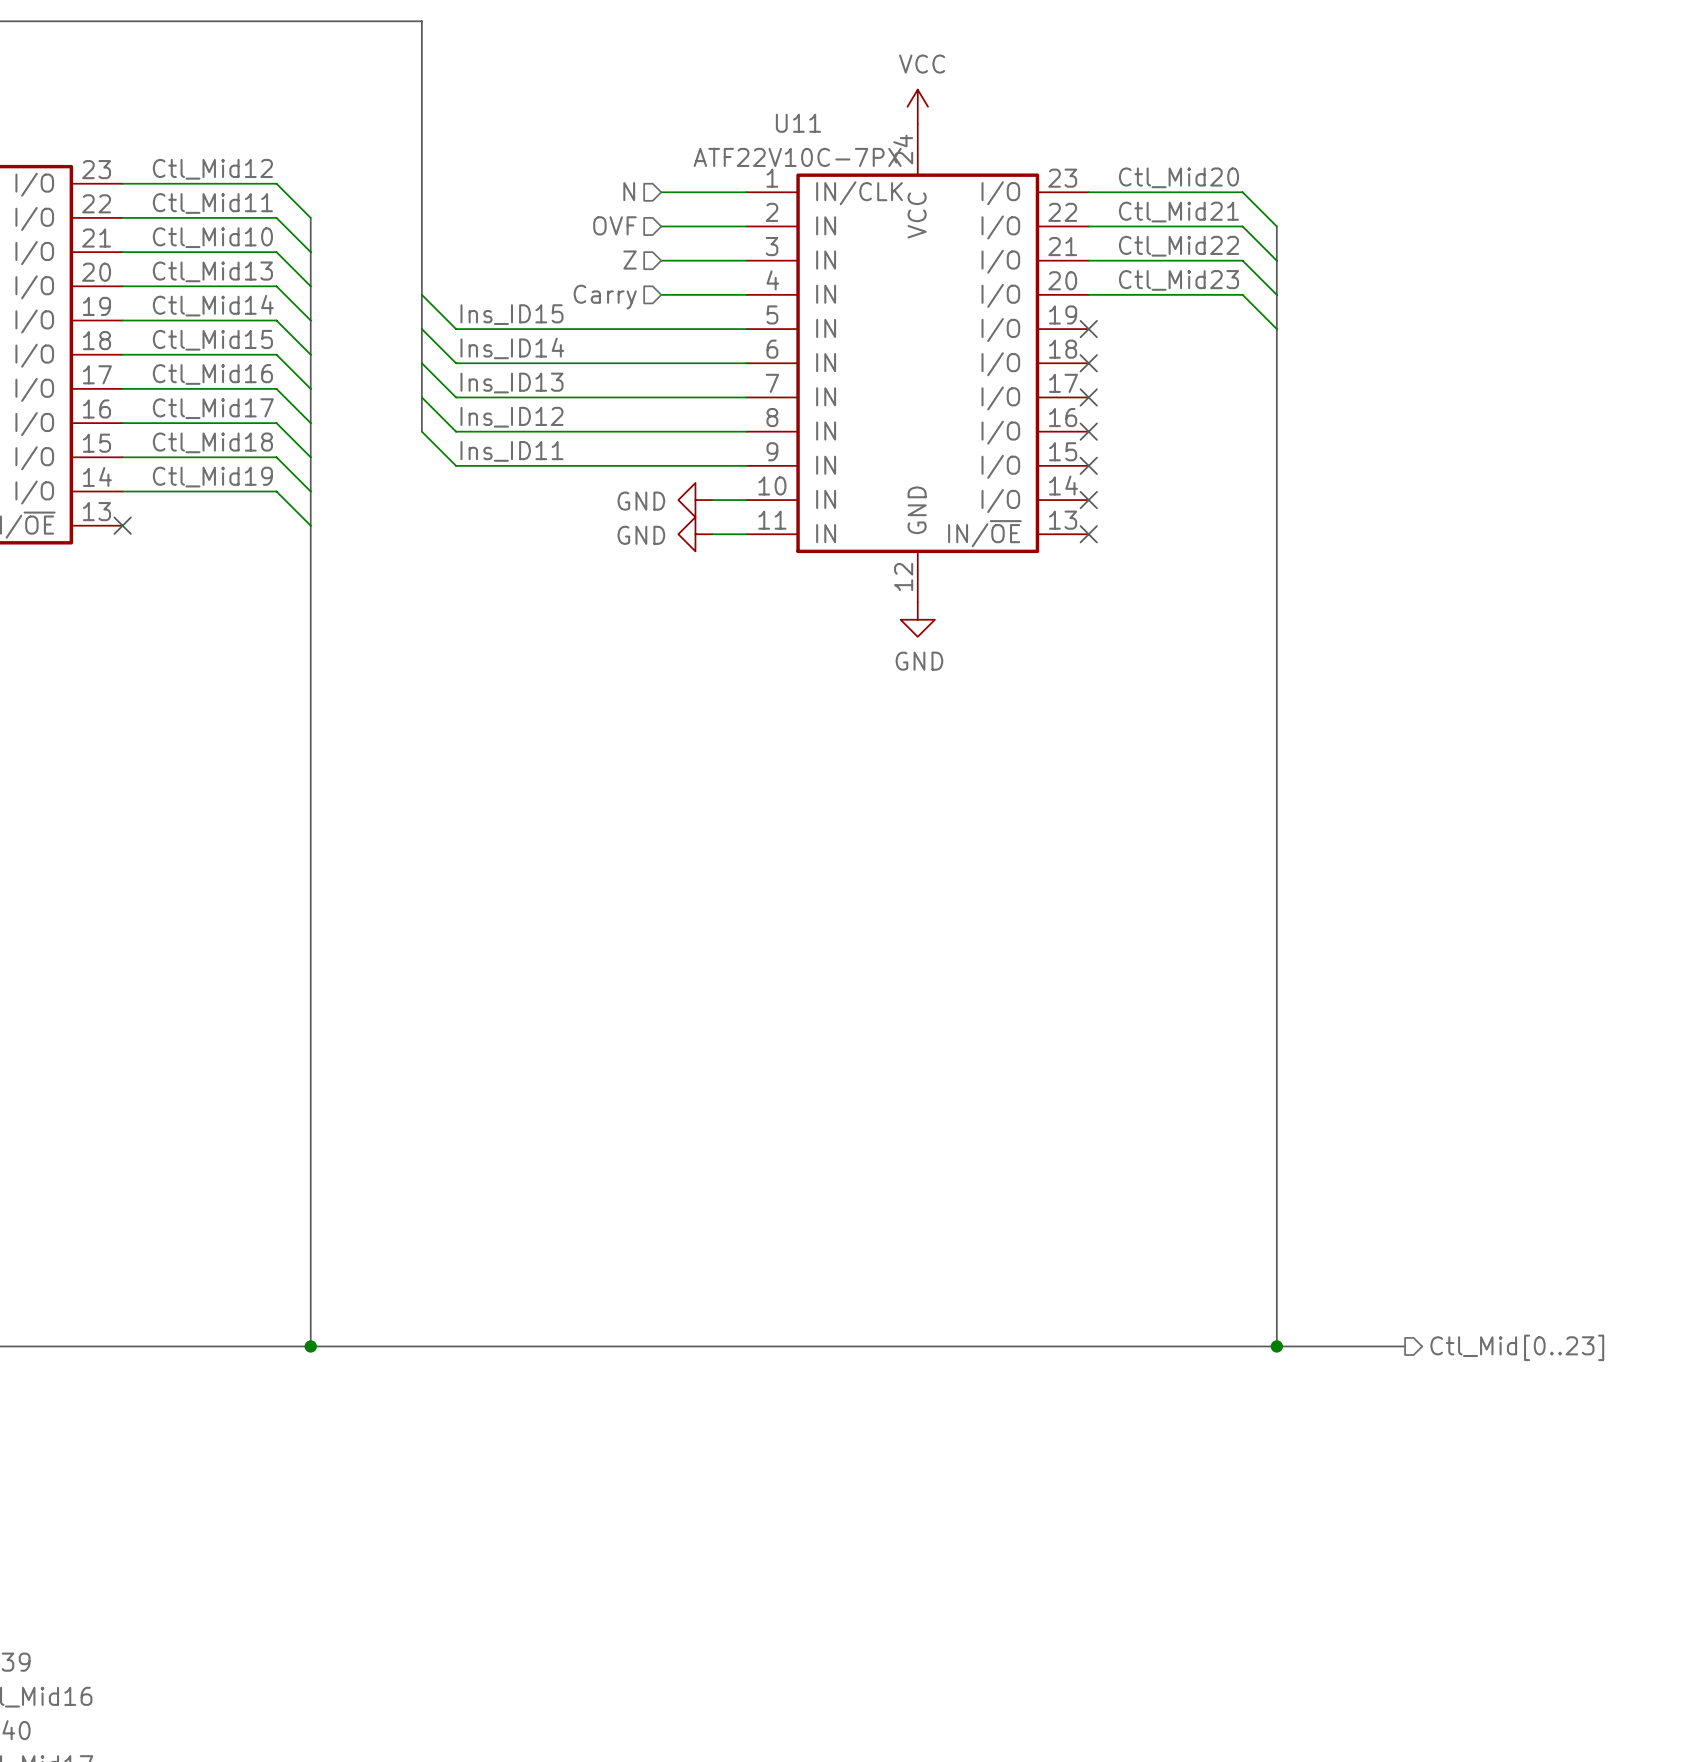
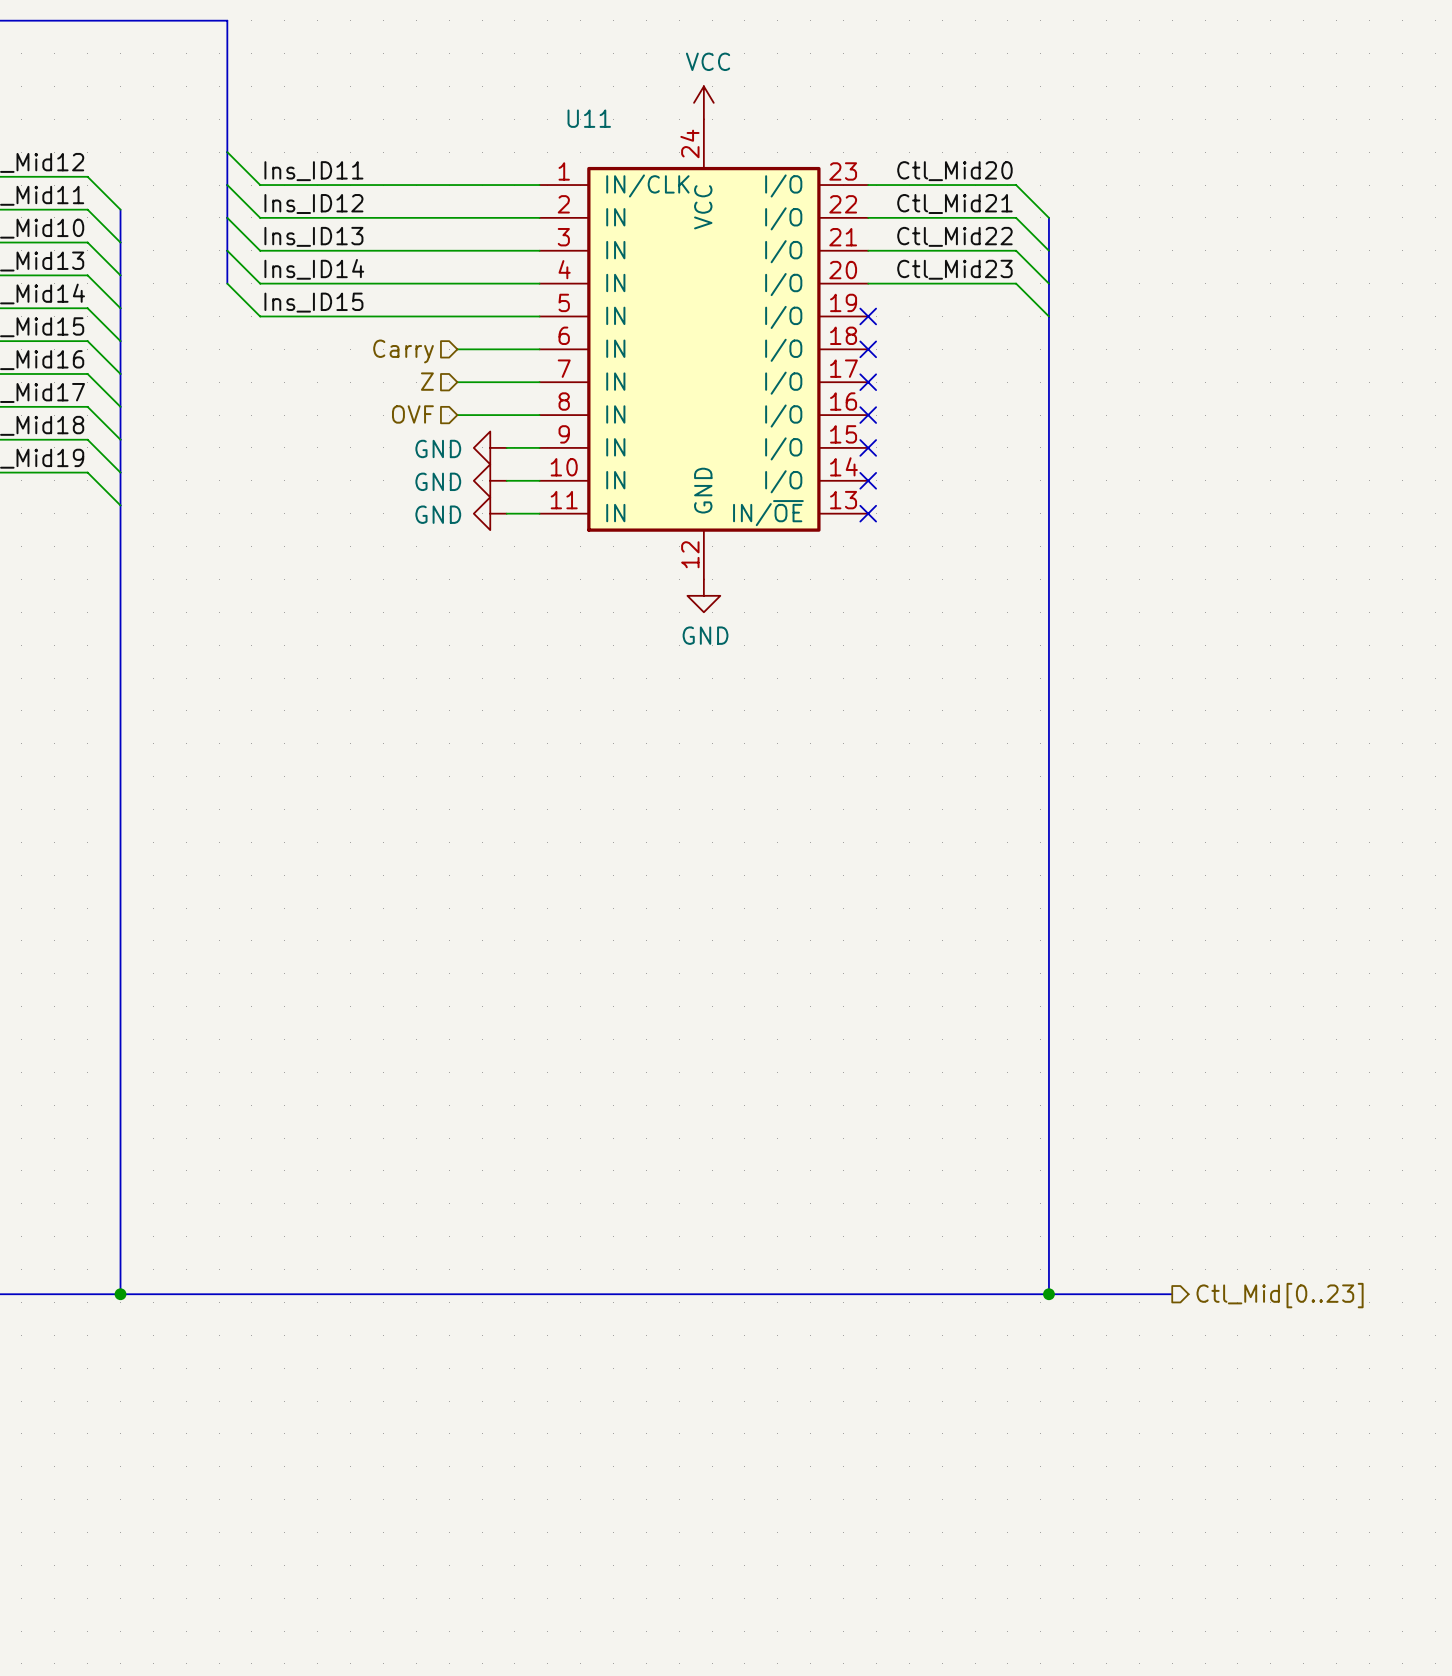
U11 value: ATF22V10C-7PX (797, 157) -> none
wire: none -> (227, 152) (260, 185) (457, 185)
hierarchical label: N (629, 191) -> none
hierarchical label position: OVF (614, 225) -> OVF (412, 414)
hierarchical label position: Z (630, 260) -> Z (427, 381)
bus: (421, 294) (421, 431) -> none
hierarchical label position: Carry (605, 297) -> Carry (403, 351)
wire: (421, 329) (456, 363) (661, 363) -> (227, 185) (260, 217) (457, 217)
label position: Ins_ID14 (512, 348) -> Ins_ID14 (314, 269)
wire: (421, 363) (456, 397) (661, 397) -> (227, 217) (260, 250) (457, 250)
label position: Ins_ID13 (511, 383) -> Ins_ID13 (313, 236)
wire: (421, 397) (456, 431) (661, 431) -> (227, 250) (260, 283) (457, 283)
label position: Ins_ID12 (511, 417) -> Ins_ID12 (313, 204)
wire: (421, 431) (456, 465) (712, 465) -> none
label position: Ins_ID11 (511, 451) -> Ins_ID11 (313, 171)
power symbol: none -> GND (490, 447)

